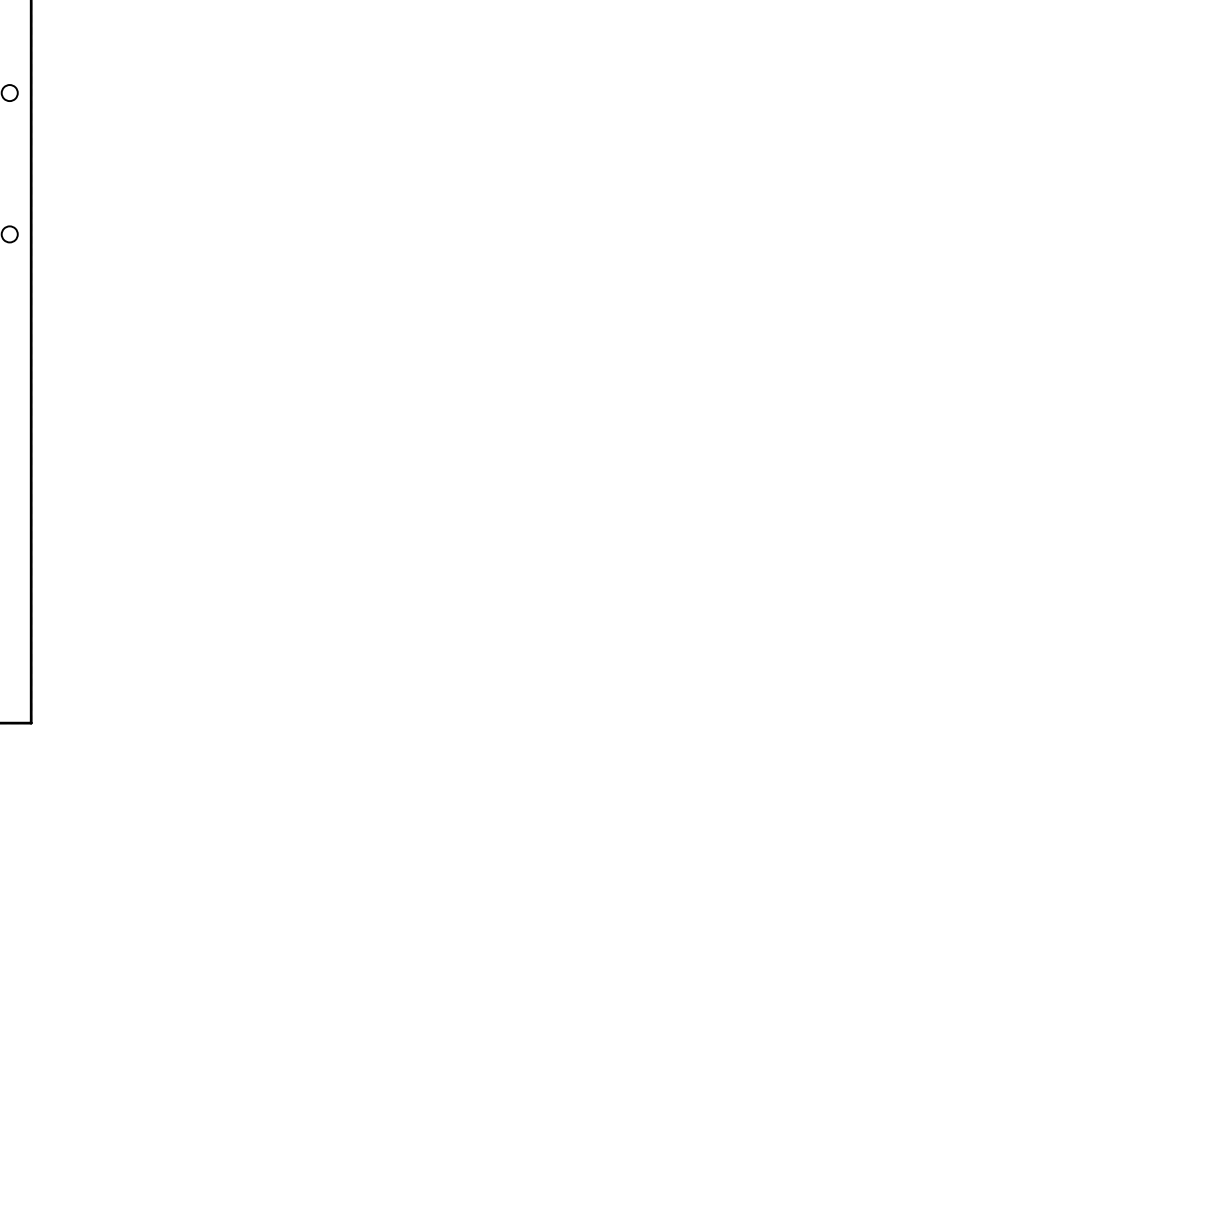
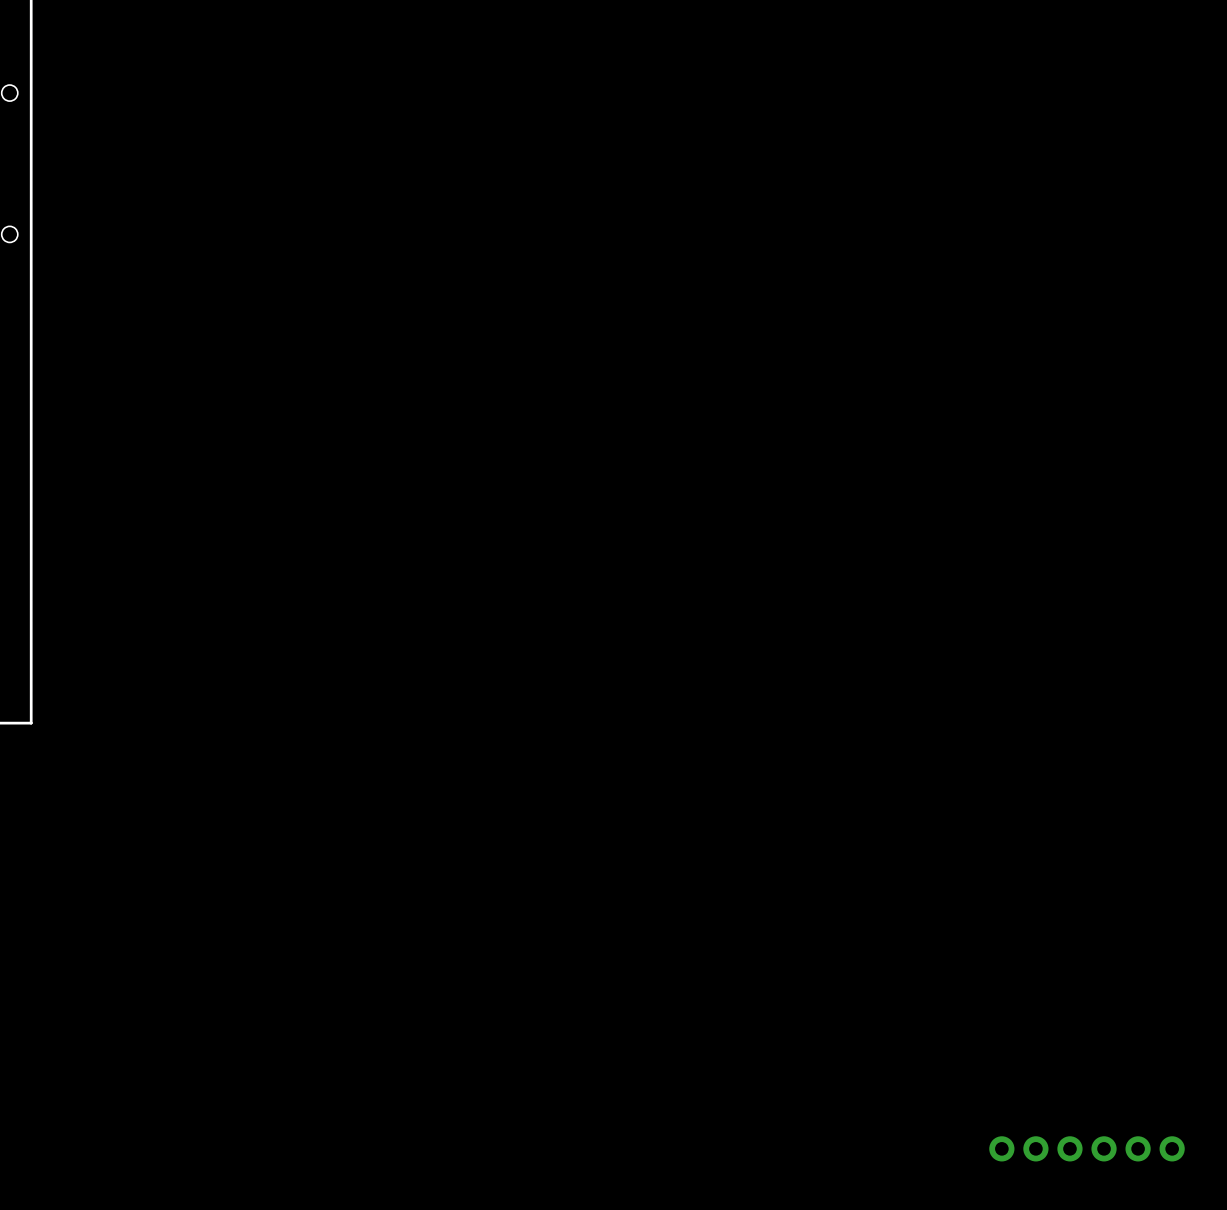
part: none -> (1087, 1148)

